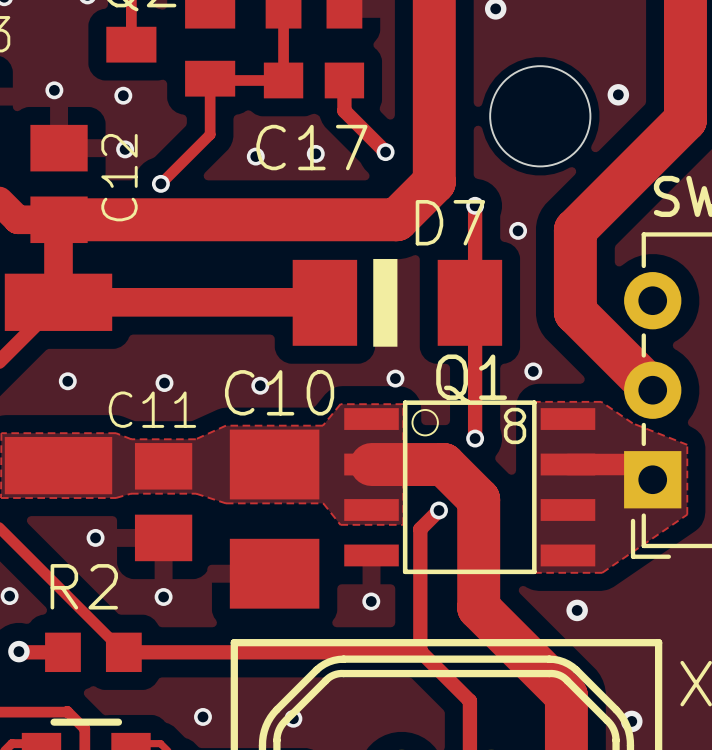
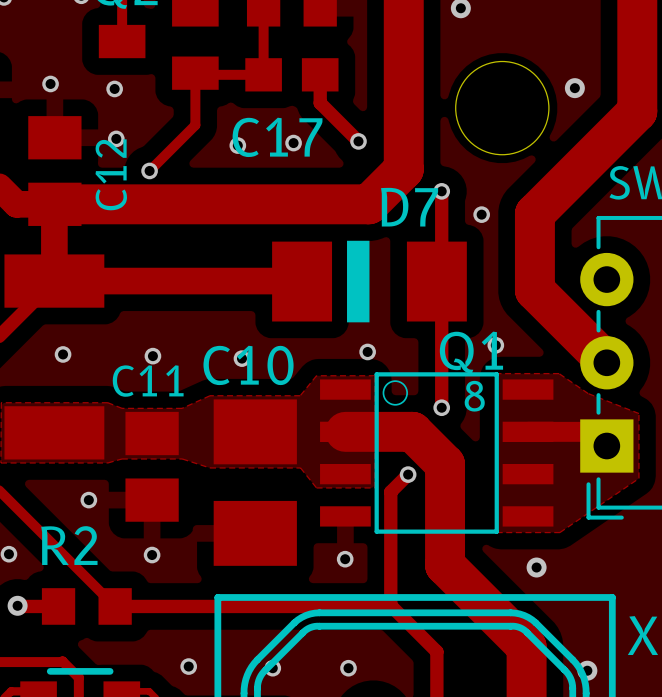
Q1 name position: Q1 (471, 379) -> Q1 (471, 352)
via: none -> (348, 668)

